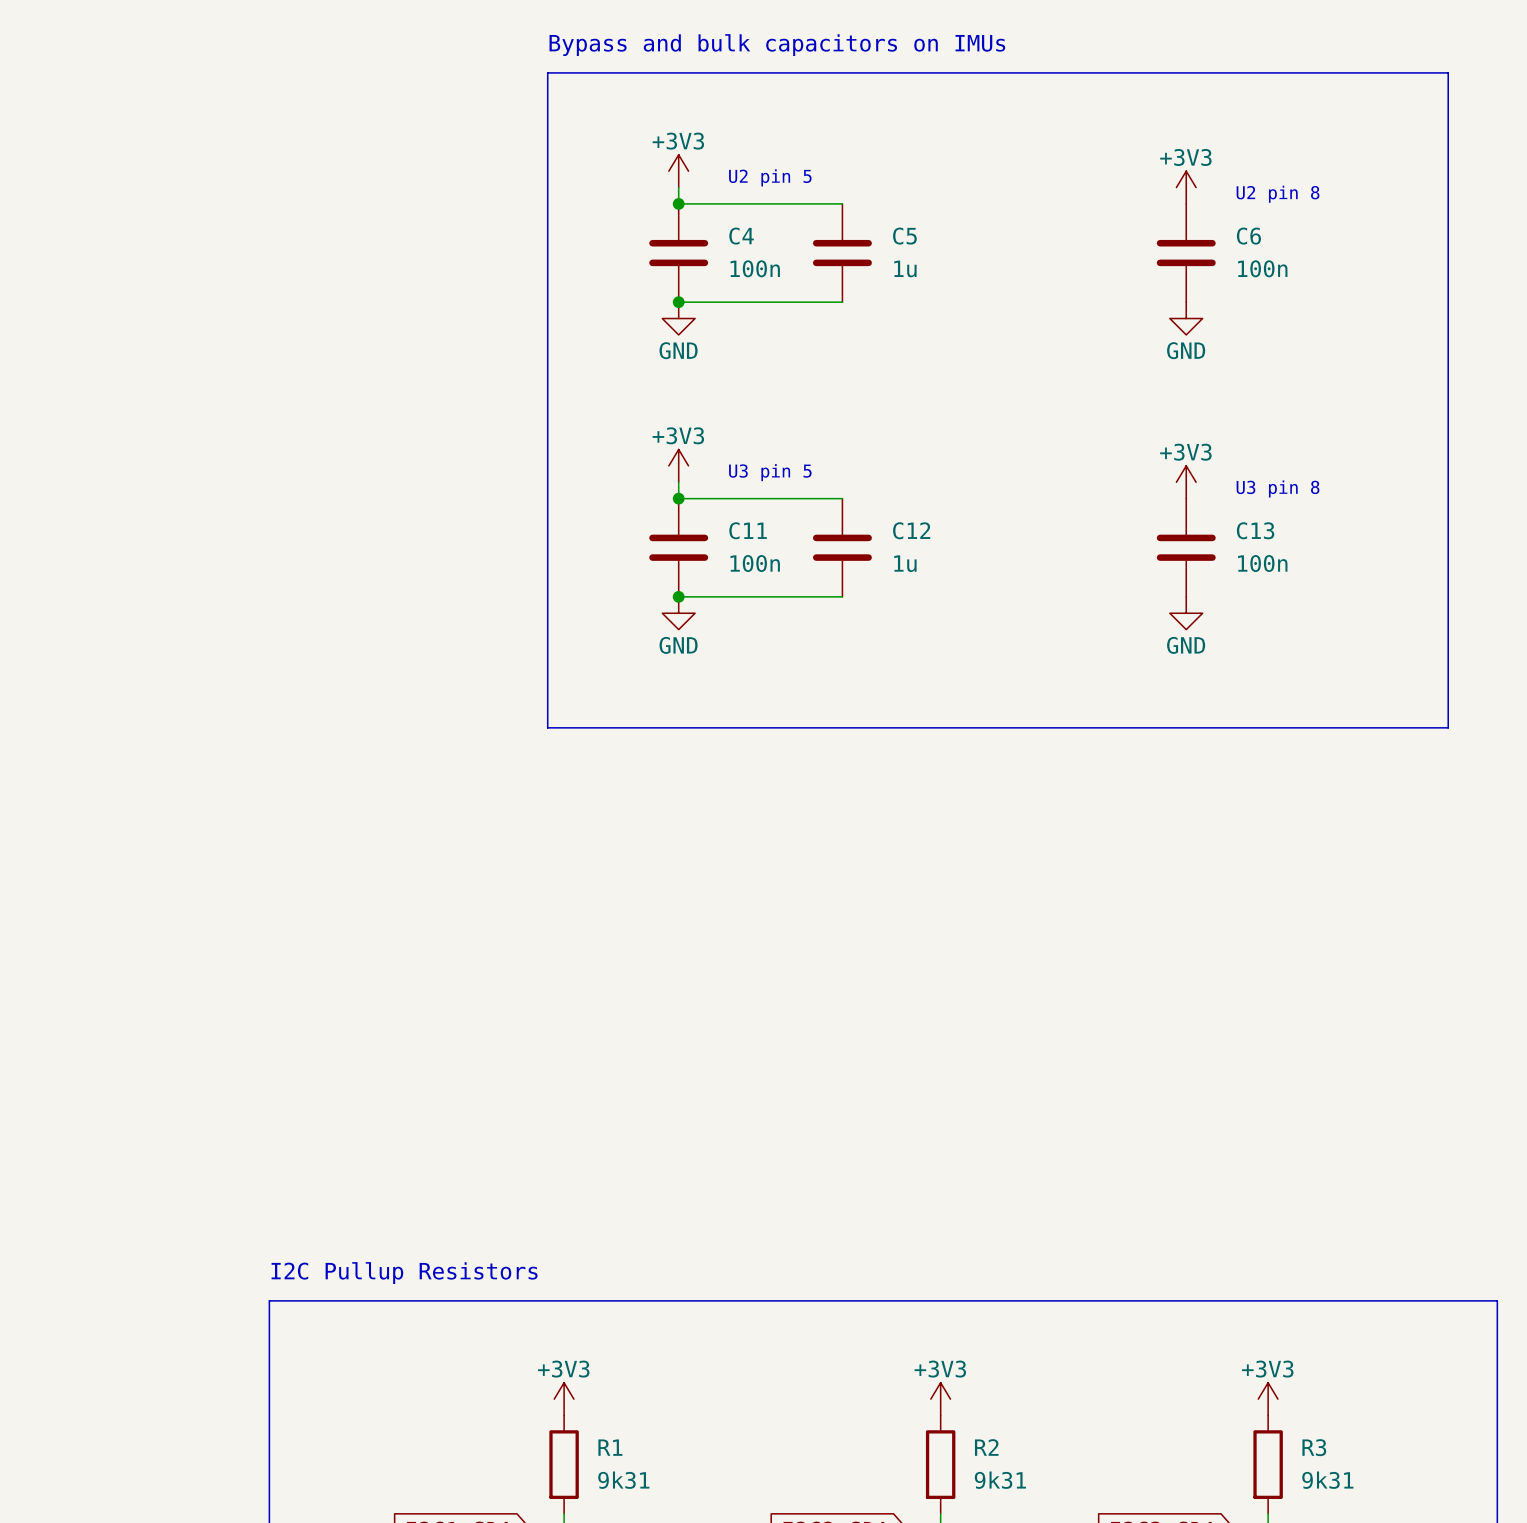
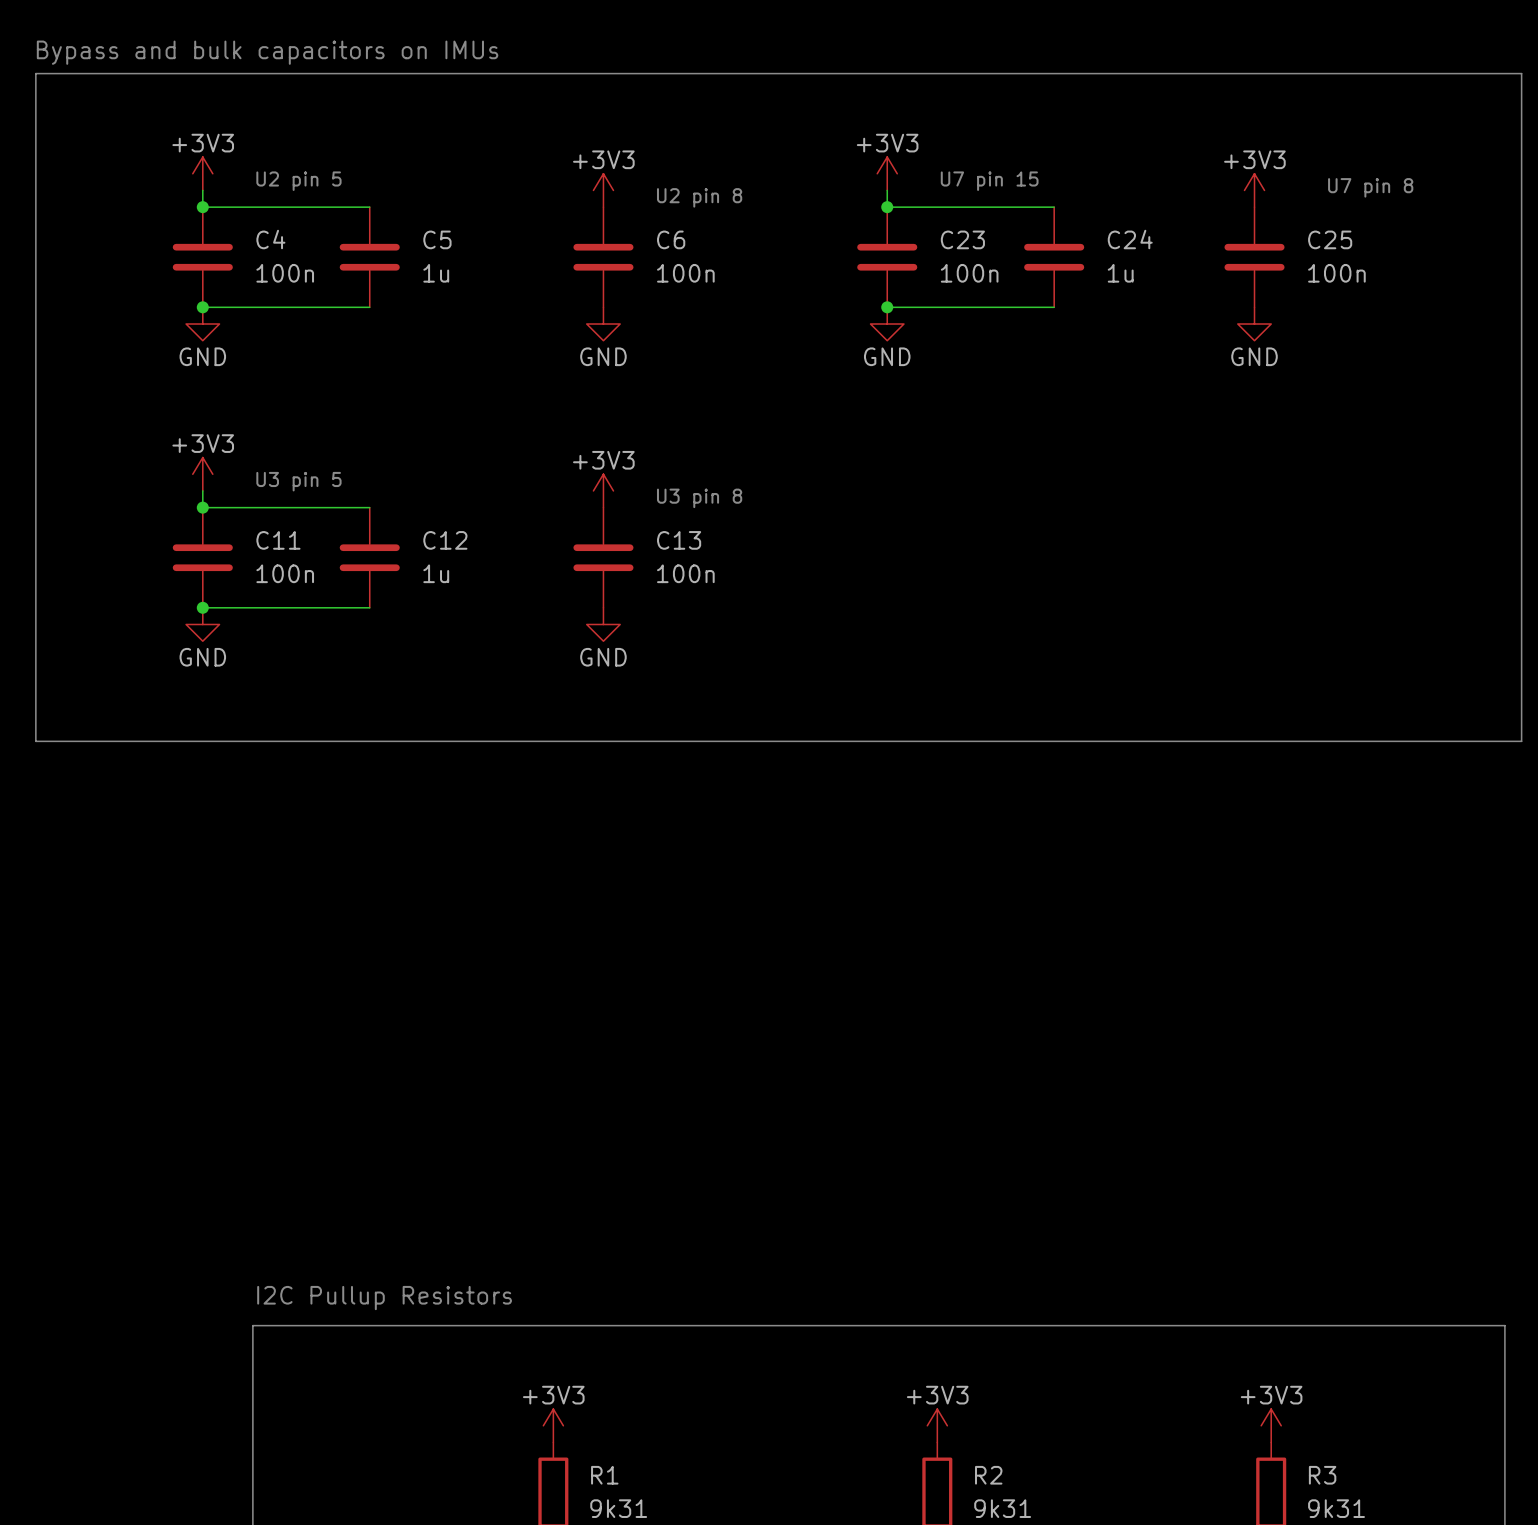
text: Bypass and bulk capacitors on IMUs (777, 45) -> none
text: none -> Bypass and bulk capacitors on IMUs (267, 52)
line: (547, 72) (547, 727) -> (536, 73) (35, 73) (35, 741) (536, 741)
line: (1448, 72) (1448, 727) -> (1454, 73) (1521, 73) (1521, 741) (1454, 741)
power symbol: none -> +3V3 (202, 173)
power symbol position: +3V3 (678, 171) -> +3V3 (603, 190)
power symbol: none -> +3V3 (887, 173)
text: none -> U2 pin 5 (298, 181)
text: U2 pin 5 (770, 177) -> U2 pin 8 (699, 197)
text: none -> U7 pin 15 (989, 181)
wire: none -> (202, 190) (202, 207) (369, 207)
wire: (678, 187) (678, 203) (842, 203) -> (887, 190) (887, 207) (1054, 207)
power symbol position: +3V3 (1186, 187) -> +3V3 (1254, 190)
text: U2 pin 8 (1278, 194) -> U7 pin 8 (1370, 187)
junction: none -> (202, 207)
junction: (678, 203) -> none
junction: none -> (887, 207)
C4 position: (678, 253) -> (202, 257)
C5 position: (842, 253) -> (369, 257)
C23: none -> 100n (887, 257)
C24: none -> 1u (1054, 257)
C6 position: (1186, 253) -> (603, 257)
C25: none -> 100n (1254, 257)
wire: none -> (202, 307) (369, 307)
junction: none -> (202, 307)
wire: (678, 302) (842, 302) -> (887, 307) (1054, 307)
junction: (678, 302) -> none
junction: none -> (887, 307)
power symbol: none -> GND (202, 324)
power symbol position: GND (678, 318) -> GND (603, 324)
power symbol: none -> GND (887, 324)
power symbol position: GND (1186, 318) -> GND (1254, 324)
power symbol: none -> +3V3 (202, 474)
power symbol position: +3V3 (678, 465) -> +3V3 (603, 490)
text: none -> U3 pin 5 (298, 481)
text: U3 pin 5 (770, 472) -> U3 pin 8 (699, 498)
wire: none -> (202, 490) (202, 507) (369, 507)
wire: (678, 482) (678, 498) (842, 498) -> none
power symbol: +3V3 (1186, 482) -> none
text: U3 pin 8 (1278, 488) -> none
junction: none -> (202, 507)
junction: (678, 498) -> none
C11 position: (678, 547) -> (202, 557)
C12 position: (842, 547) -> (369, 557)
C13 position: (1186, 547) -> (603, 557)
wire: none -> (202, 607) (369, 607)
junction: none -> (202, 607)
wire: (678, 596) (842, 596) -> none
junction: (678, 596) -> none
power symbol: none -> GND (202, 624)
power symbol position: GND (678, 613) -> GND (603, 624)
power symbol: GND (1186, 613) -> none

